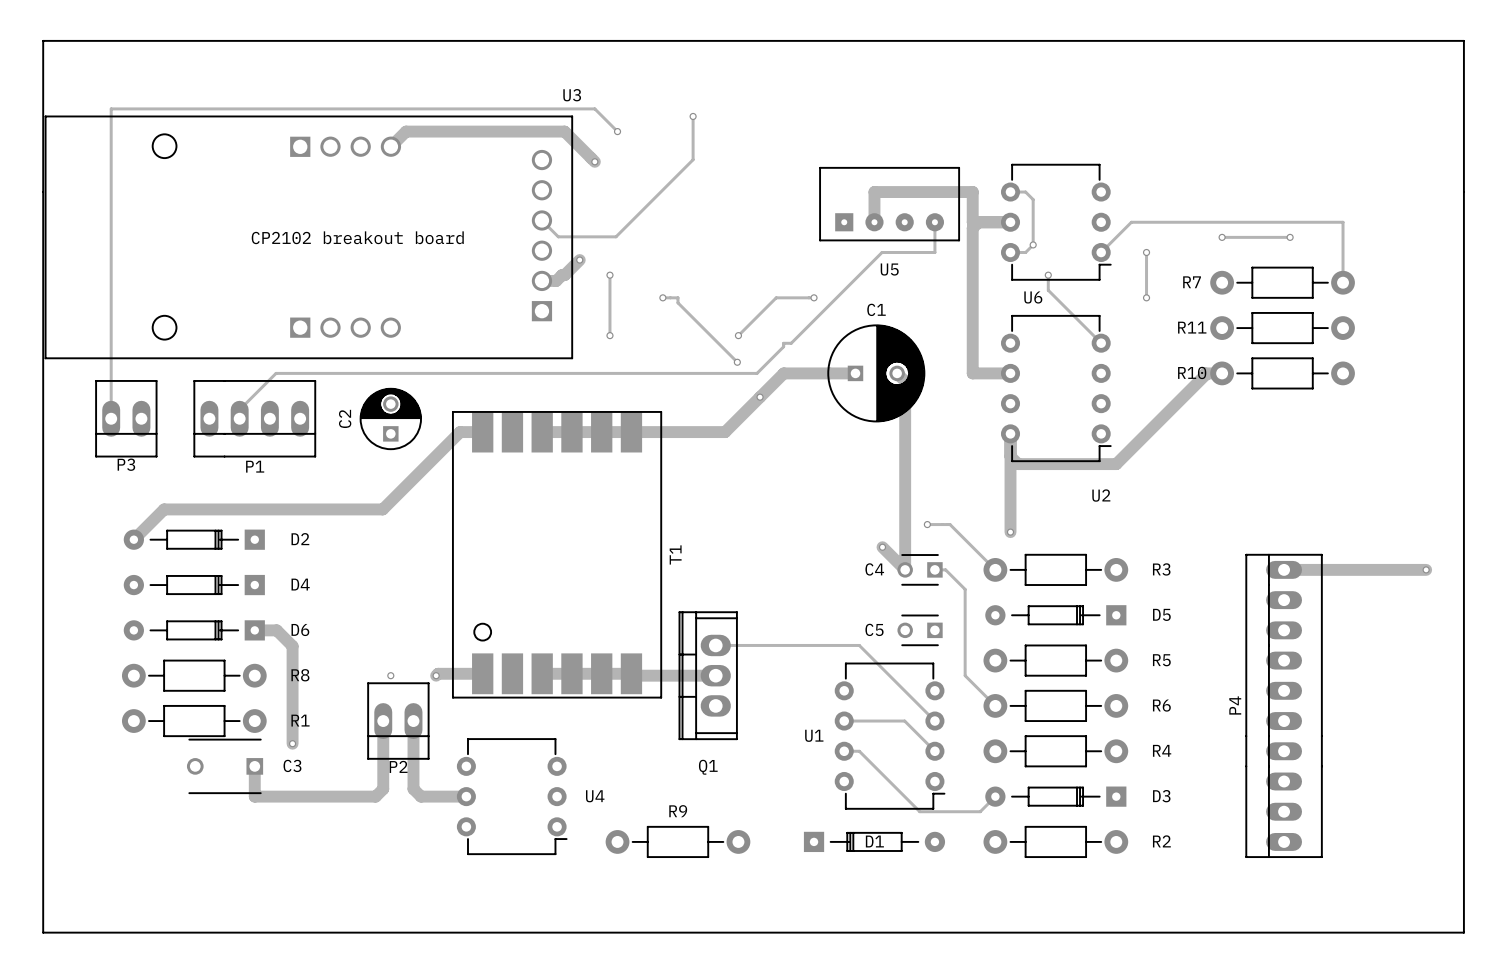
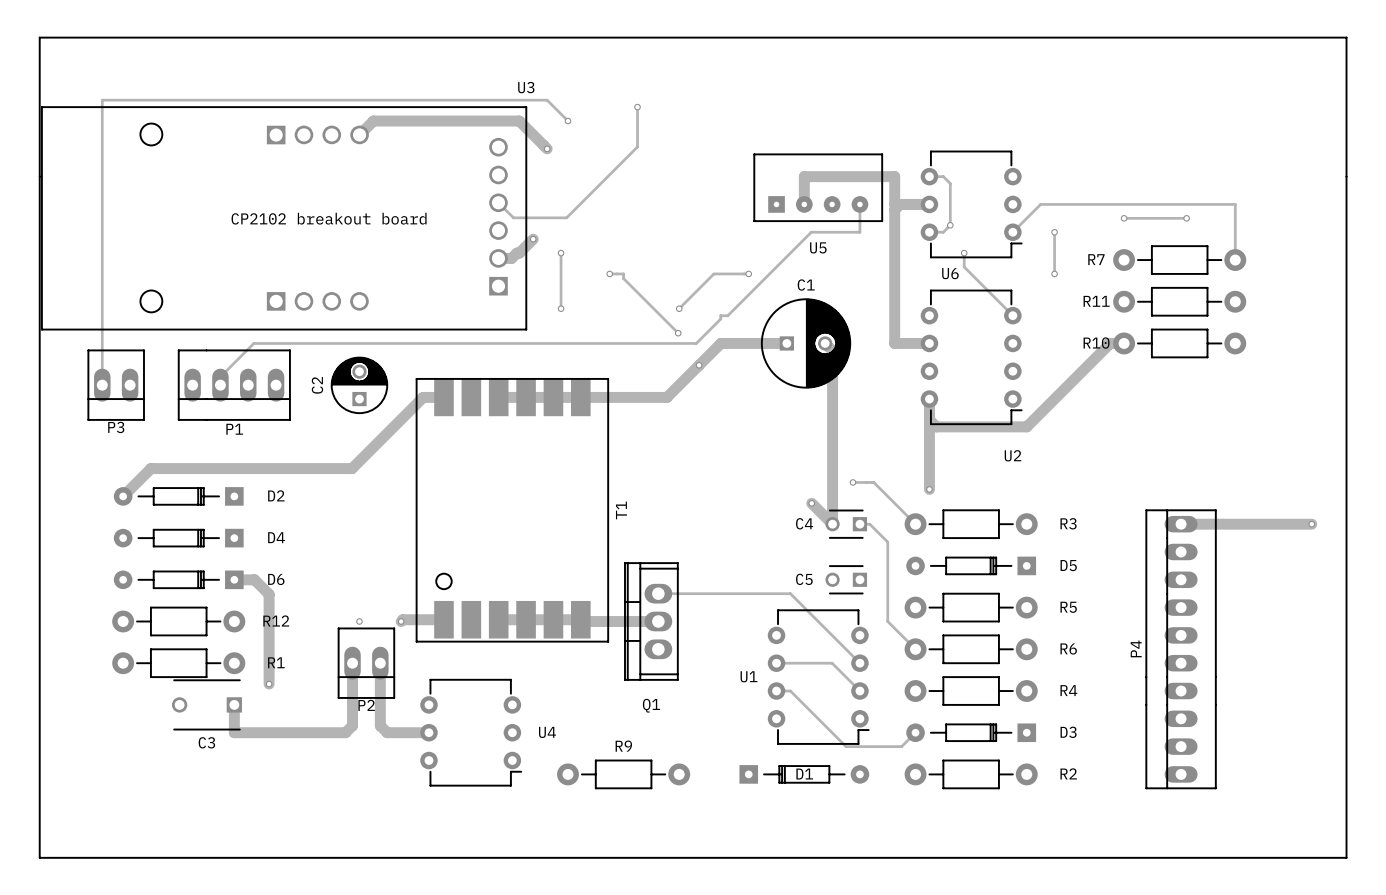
R8 name: R8 (300, 675) -> R12 (276, 620)
C3 name position: C3 (292, 765) -> C3 (206, 742)

